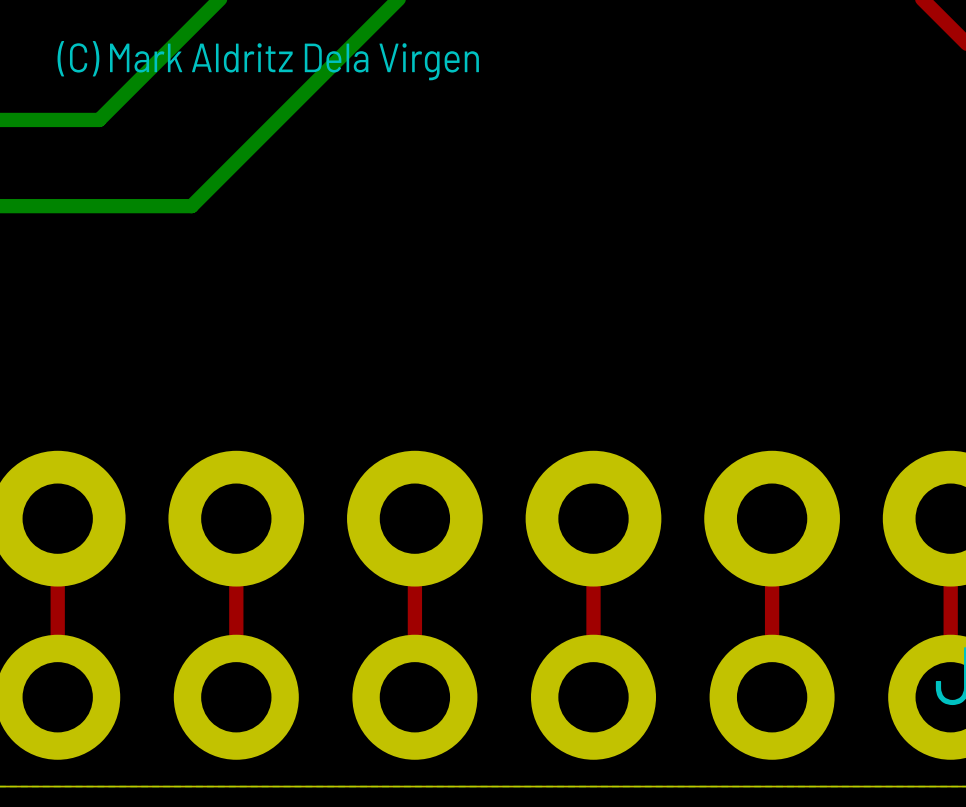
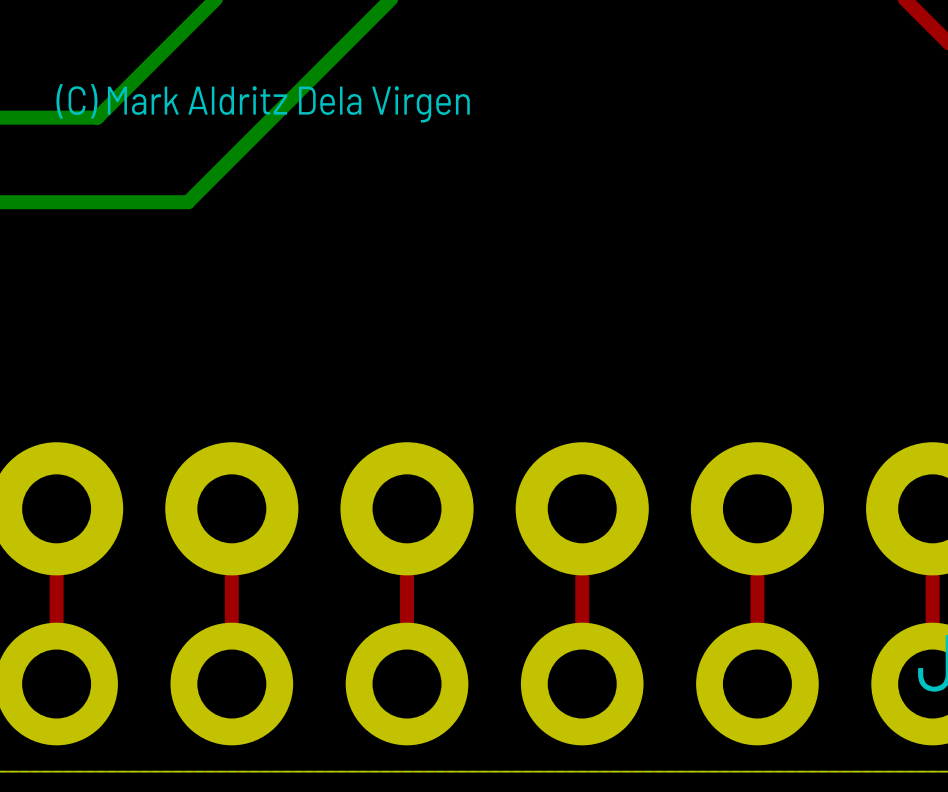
text position: (C) Mark Aldritz Dela Virgen (268, 60) -> (C) Mark Aldritz Dela Virgen (263, 103)

